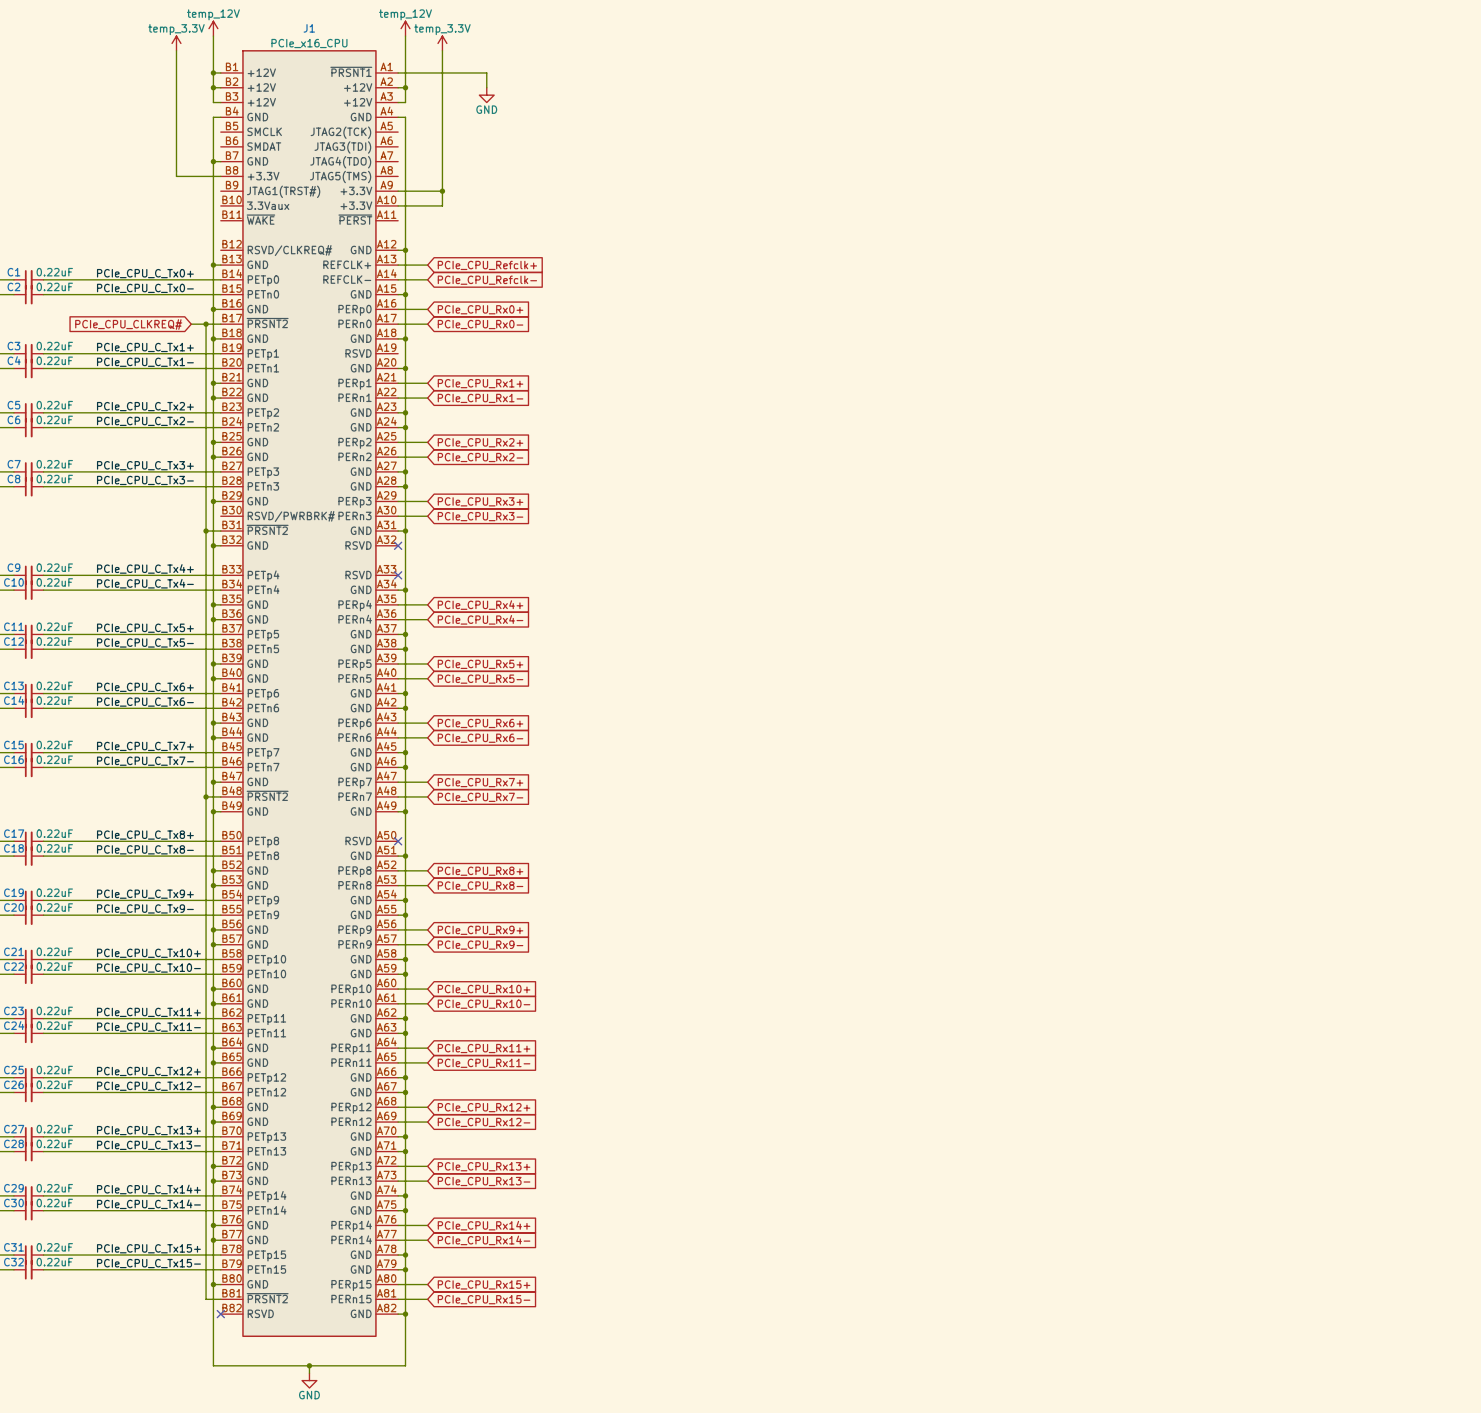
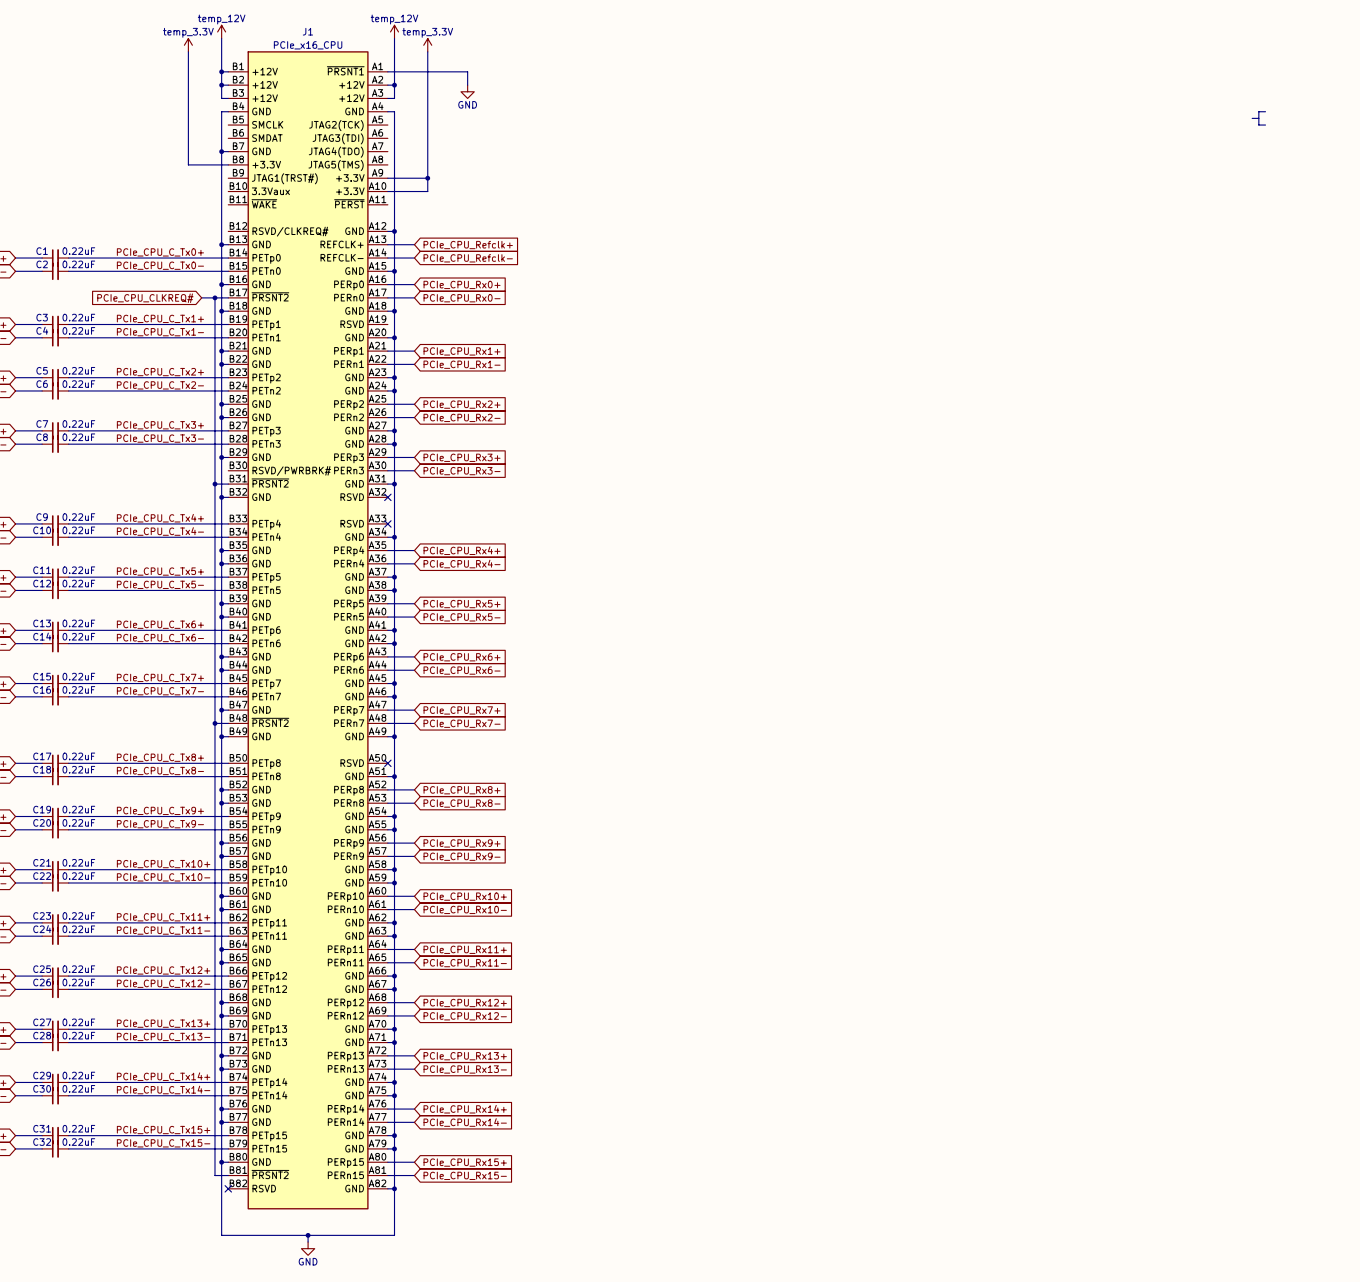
line: none -> (1265, 111) (1258, 111) (1258, 125) (1265, 125)
line: none -> (1252, 118) (1258, 118)

